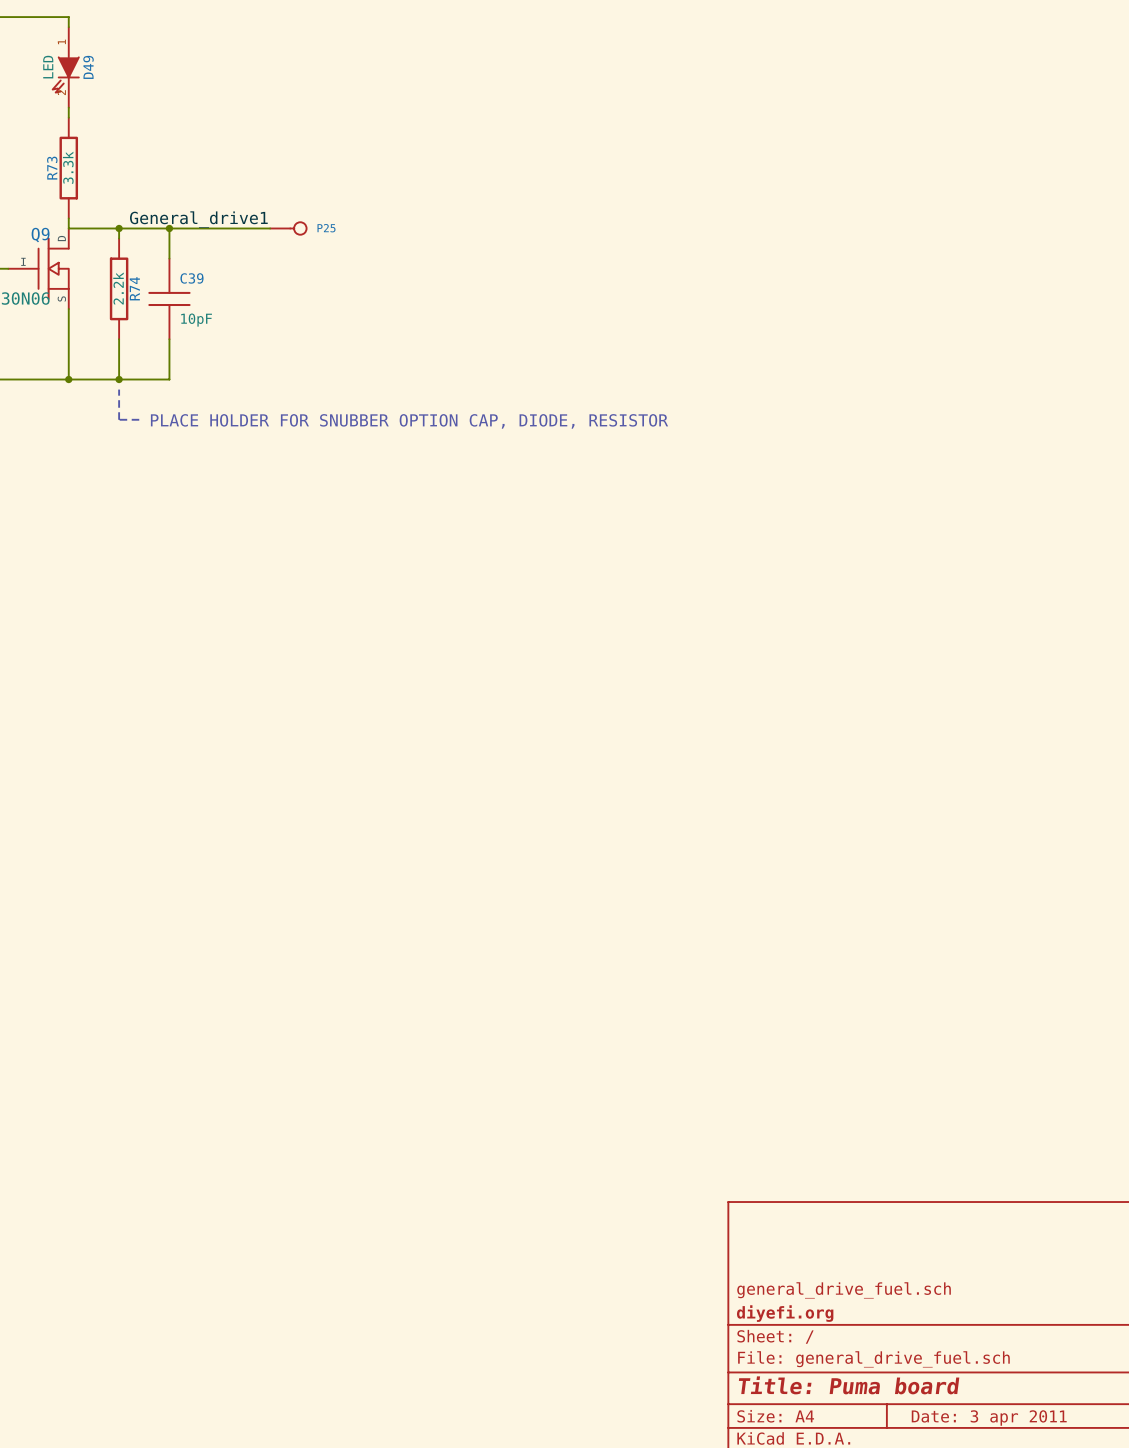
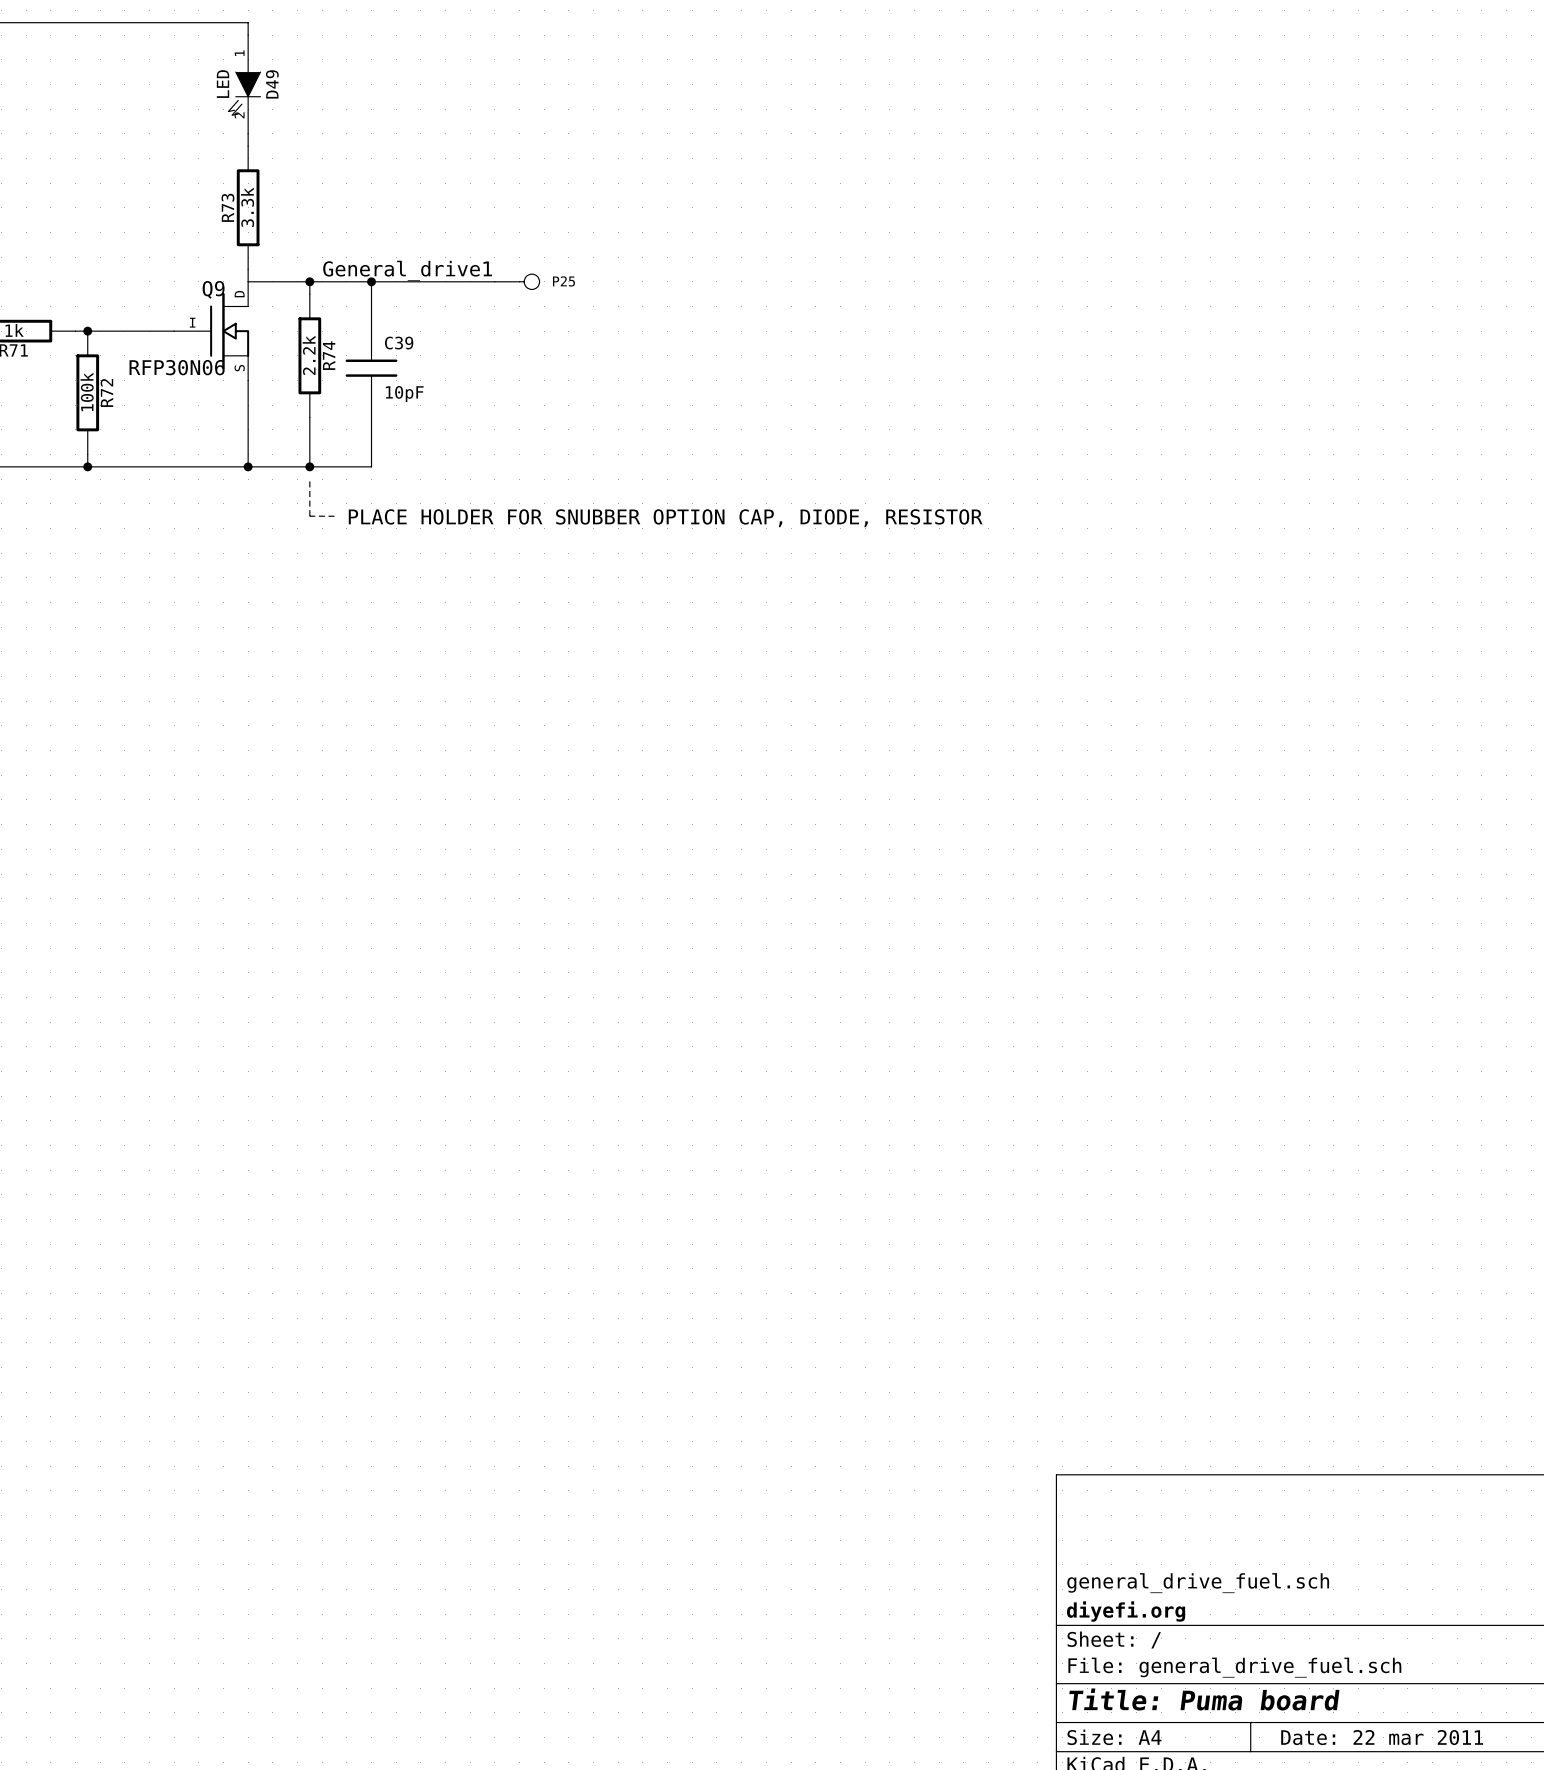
title block: Date: 3 apr 2011 (989, 1417) -> Date: 22 mar 2011 (1382, 1737)

